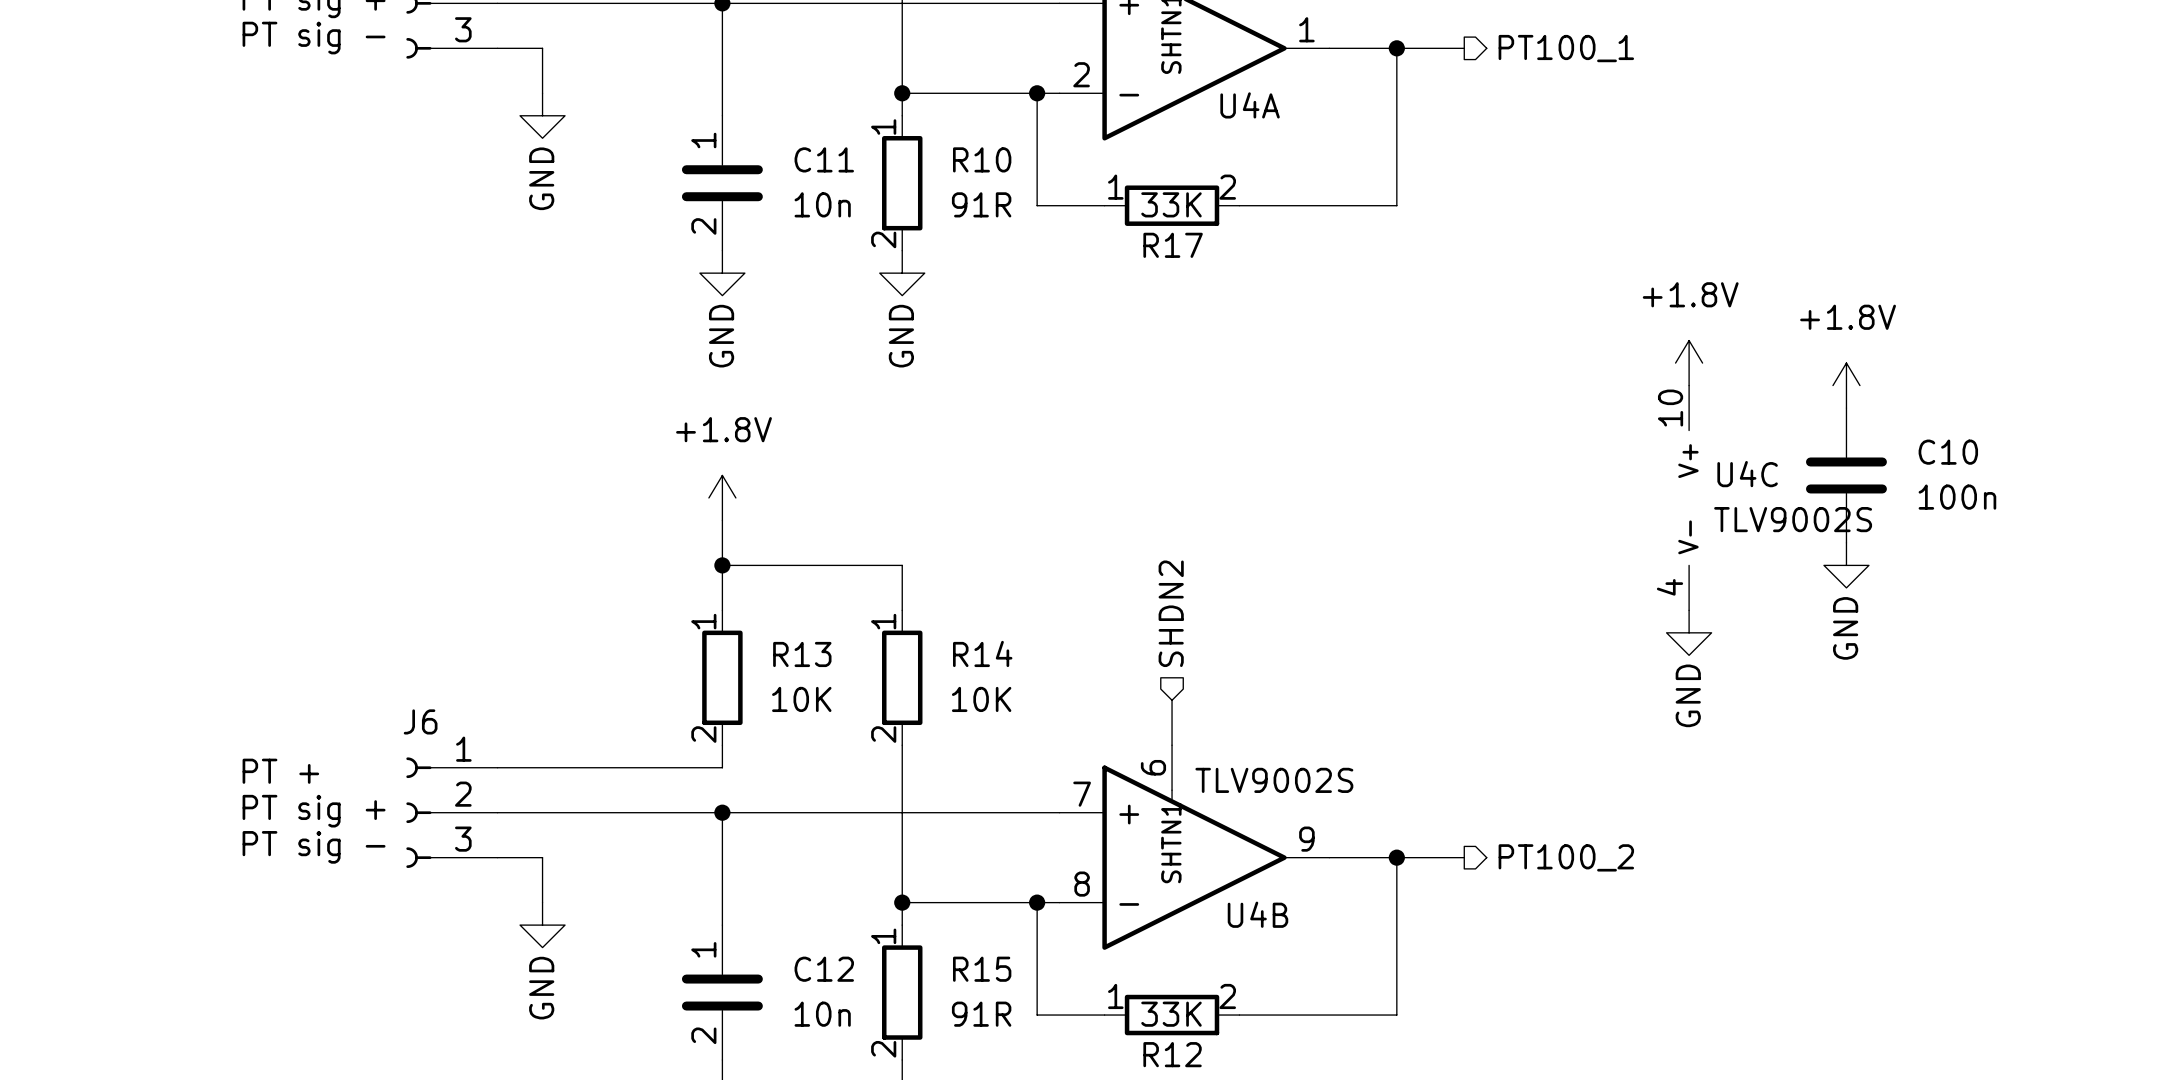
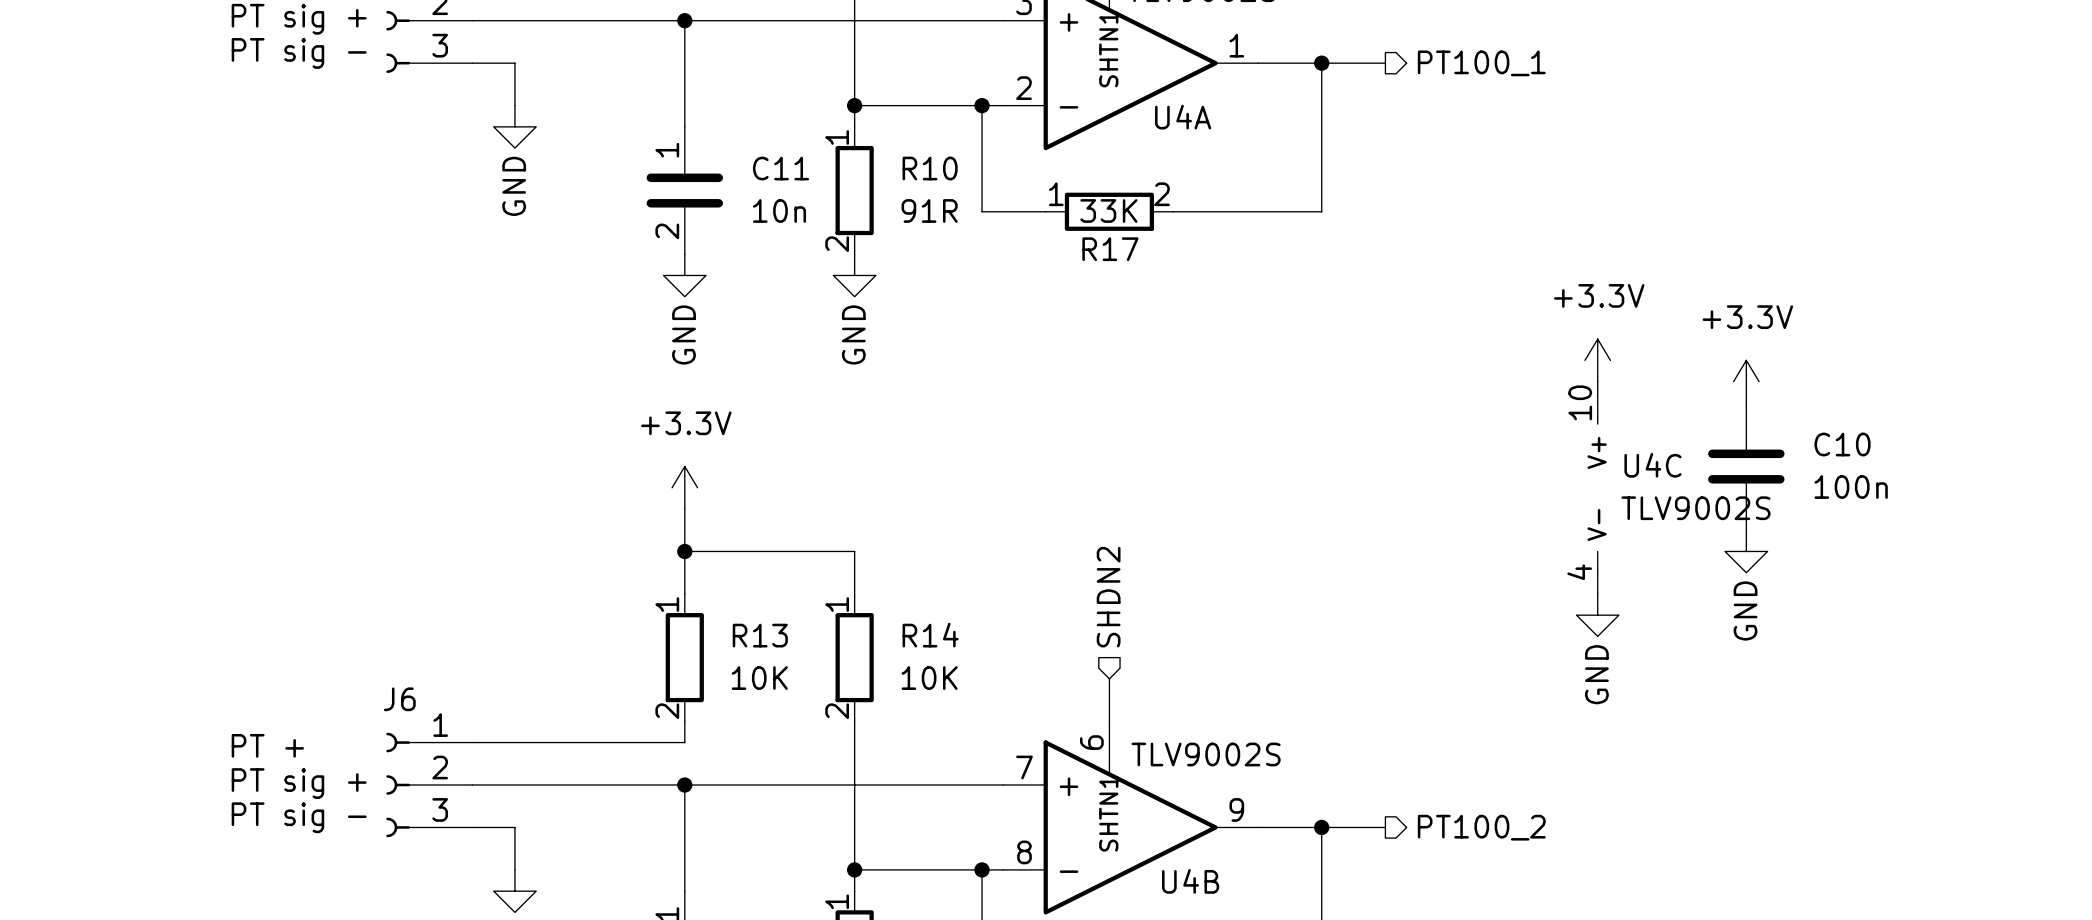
power symbol: +1.8V (1689, 363) -> +3.3V (1597, 360)
power symbol: +1.8V (1846, 385) -> +3.3V (1746, 381)
power symbol: +1.8V (722, 497) -> +3.3V (684, 487)

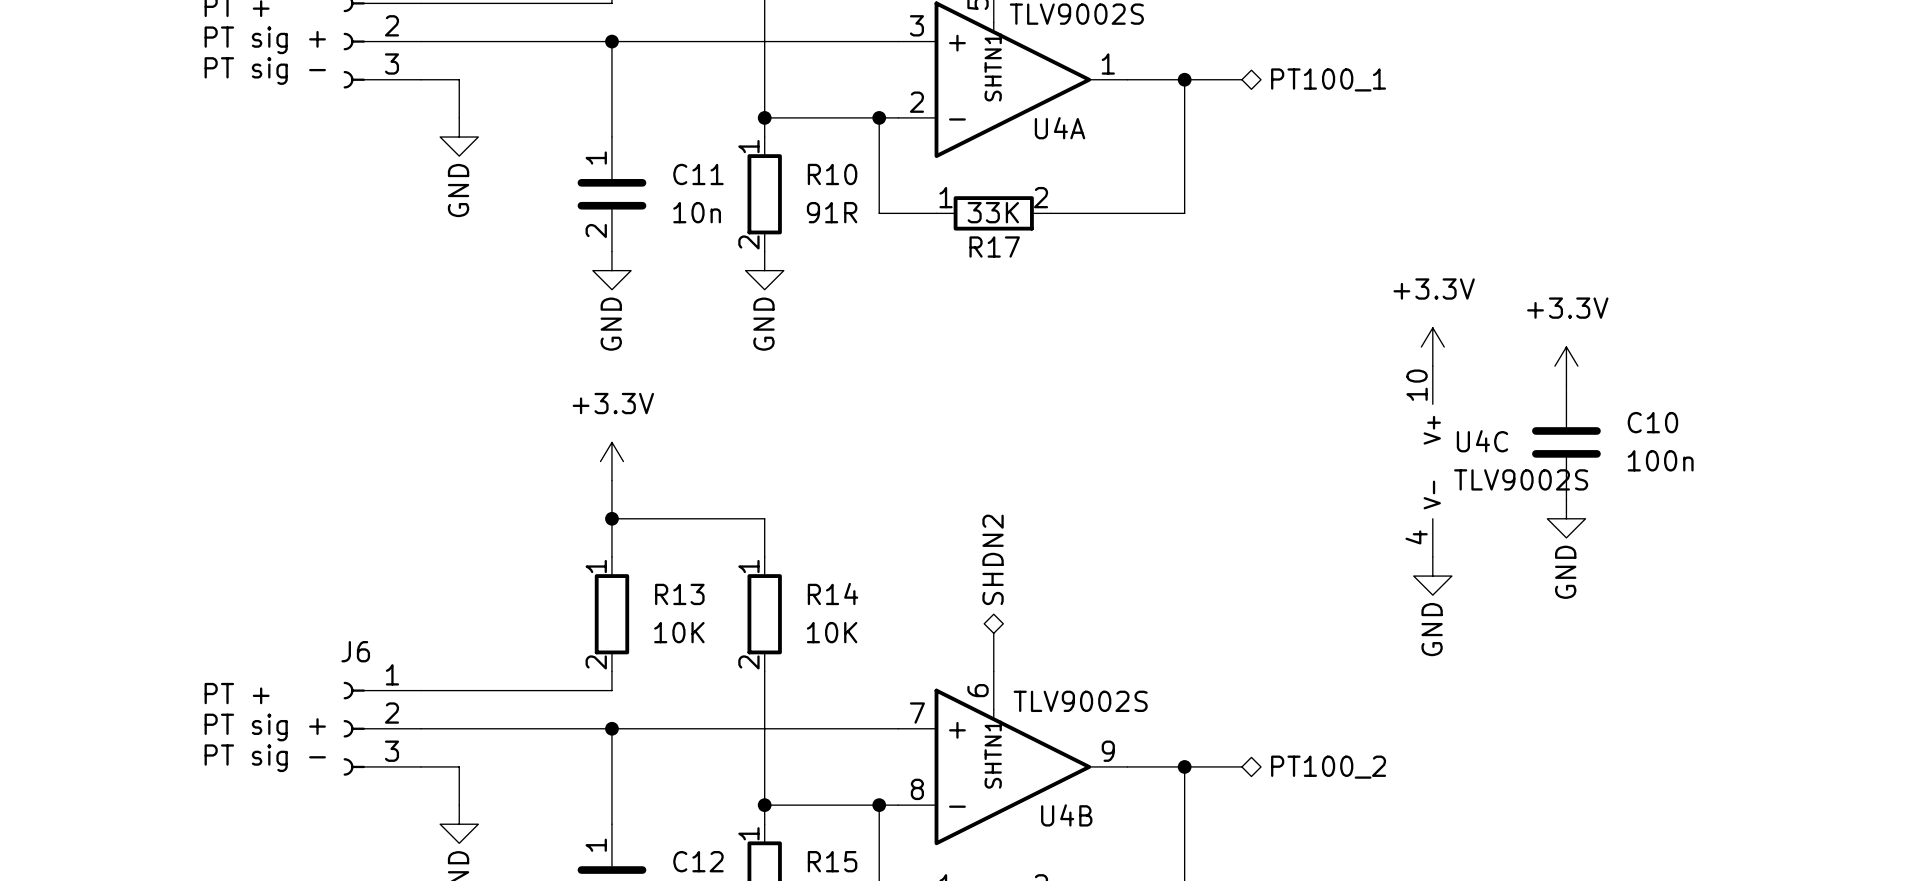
hierarchical label shape: output (1481, 63) -> bidirectional (1328, 79)
hierarchical label shape: input (1108, 597) -> bidirectional (993, 559)
hierarchical label shape: output (1481, 827) -> bidirectional (1328, 767)

